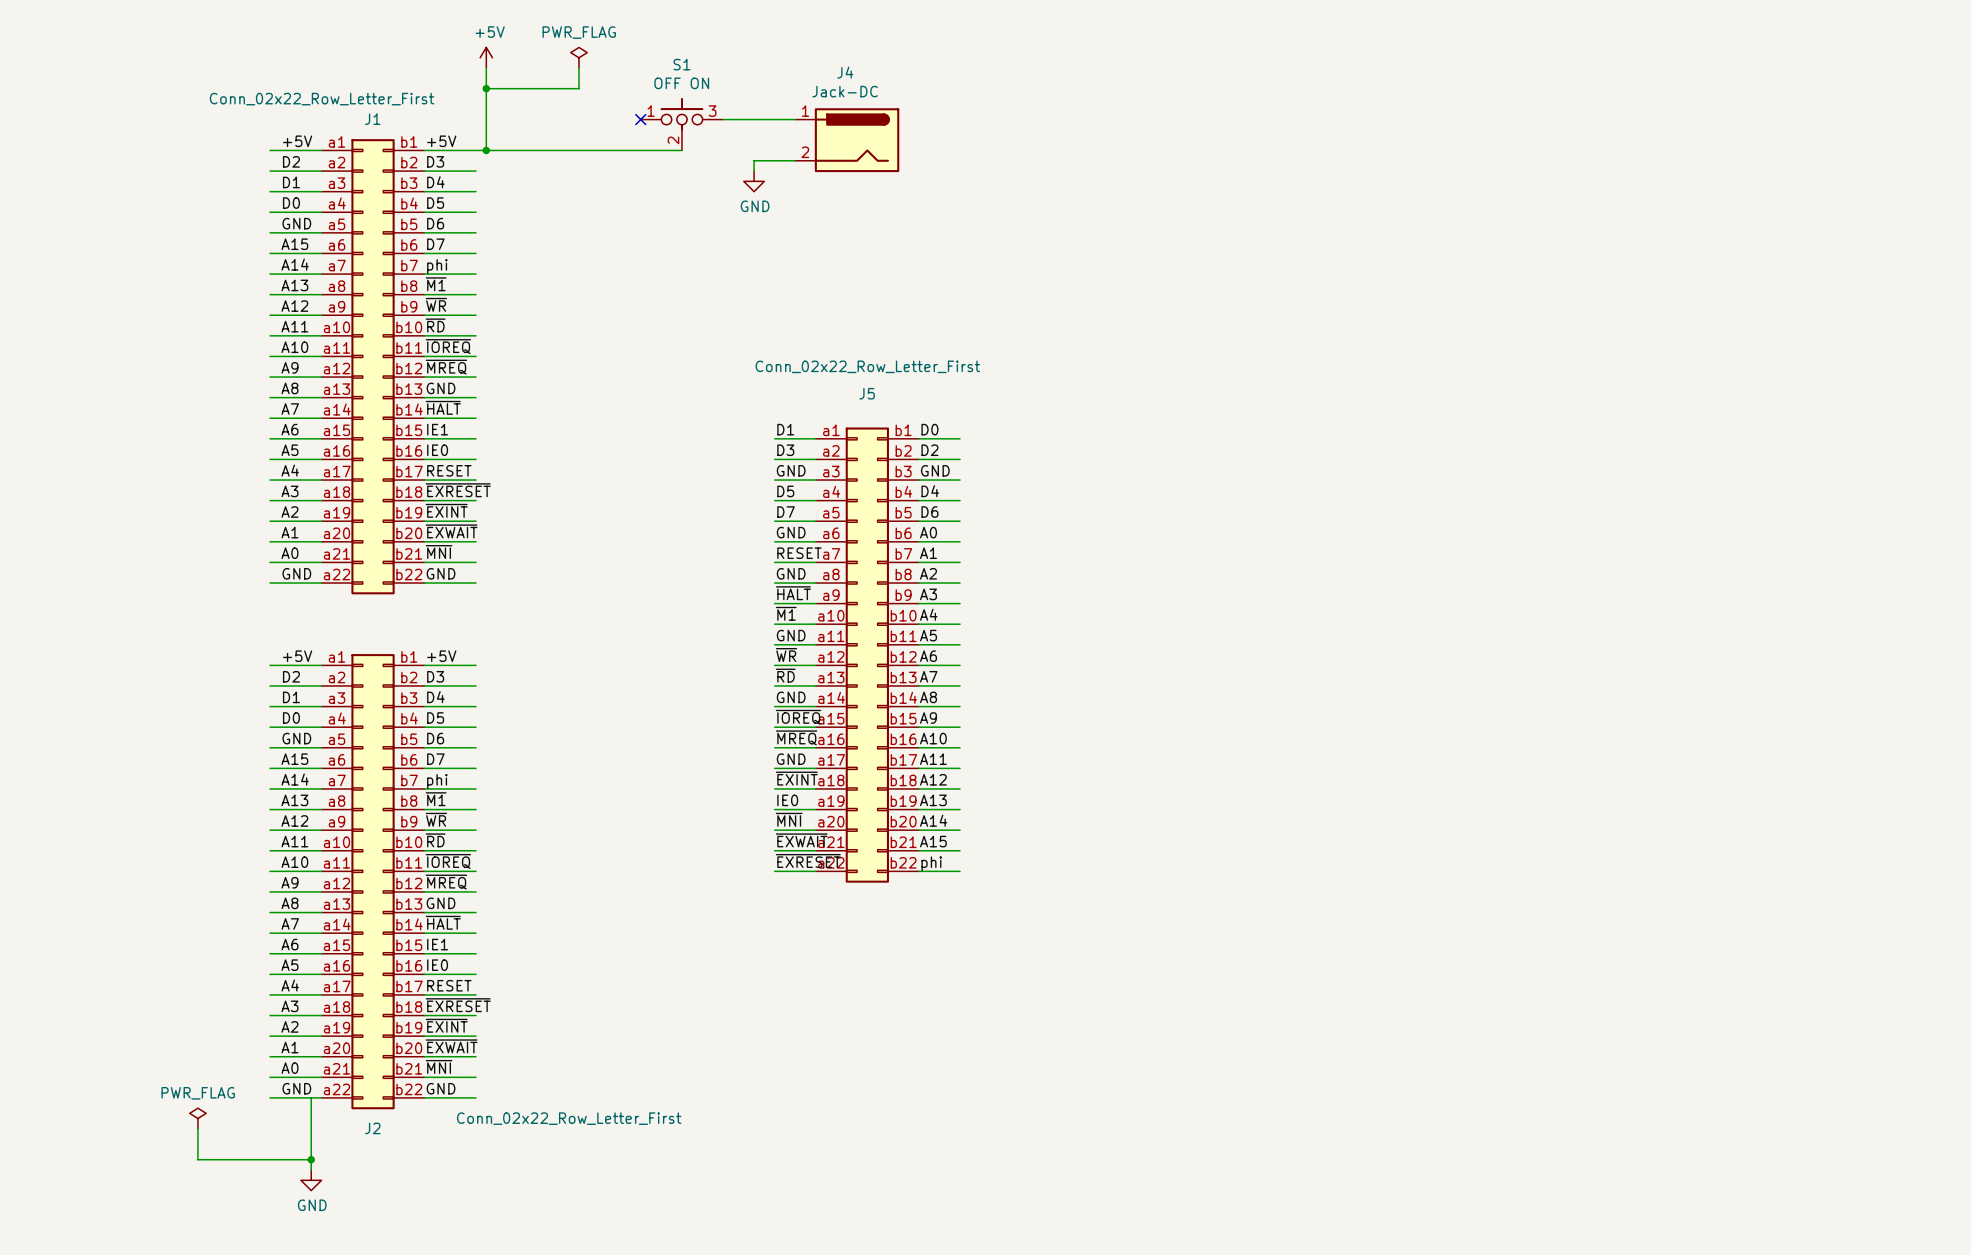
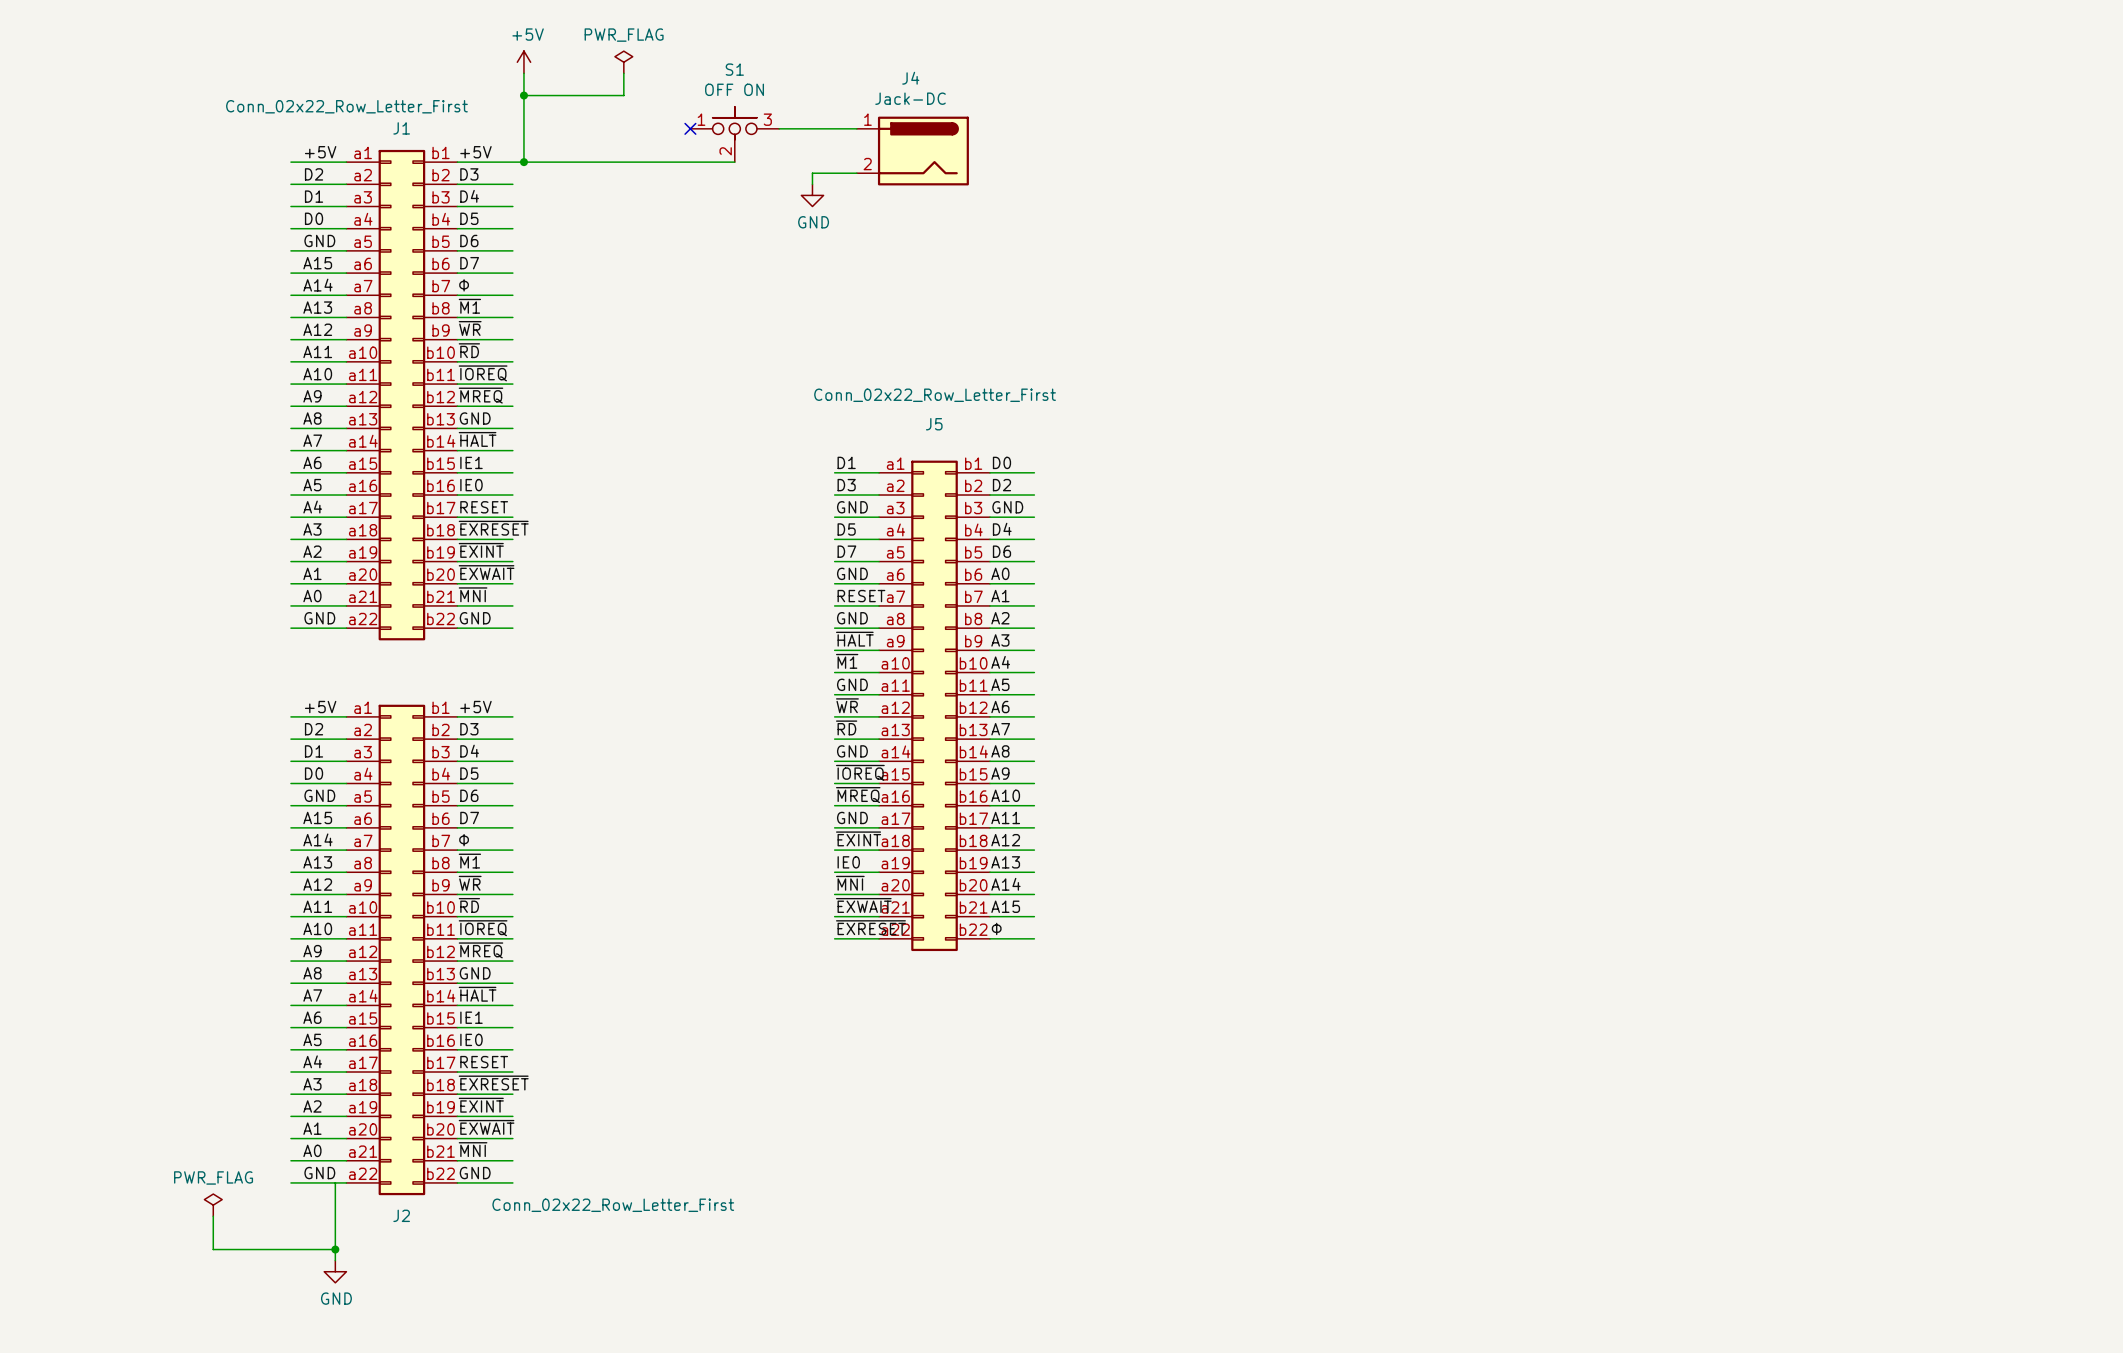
label: phi (437, 266) -> Φ (464, 285)
label: phi (437, 781) -> Φ (464, 840)
label: phi (931, 863) -> Φ (996, 928)

